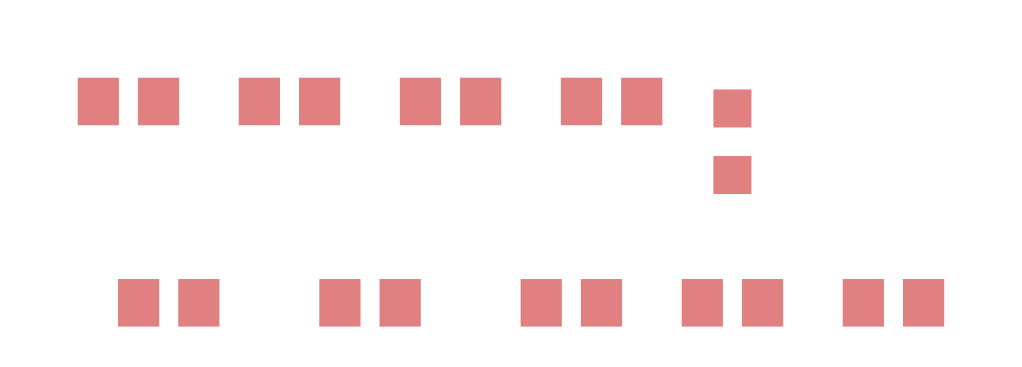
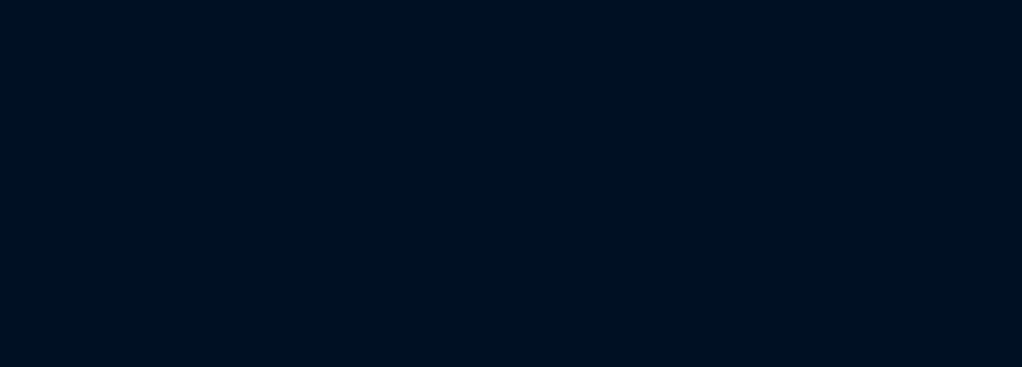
part: (128, 101) -> none
part: (289, 101) -> none
part: (450, 101) -> none
part: (611, 101) -> none
part: (732, 141) -> none
part: (168, 302) -> none
part: (370, 302) -> none
part: (571, 302) -> none
part: (732, 302) -> none
part: (893, 302) -> none

